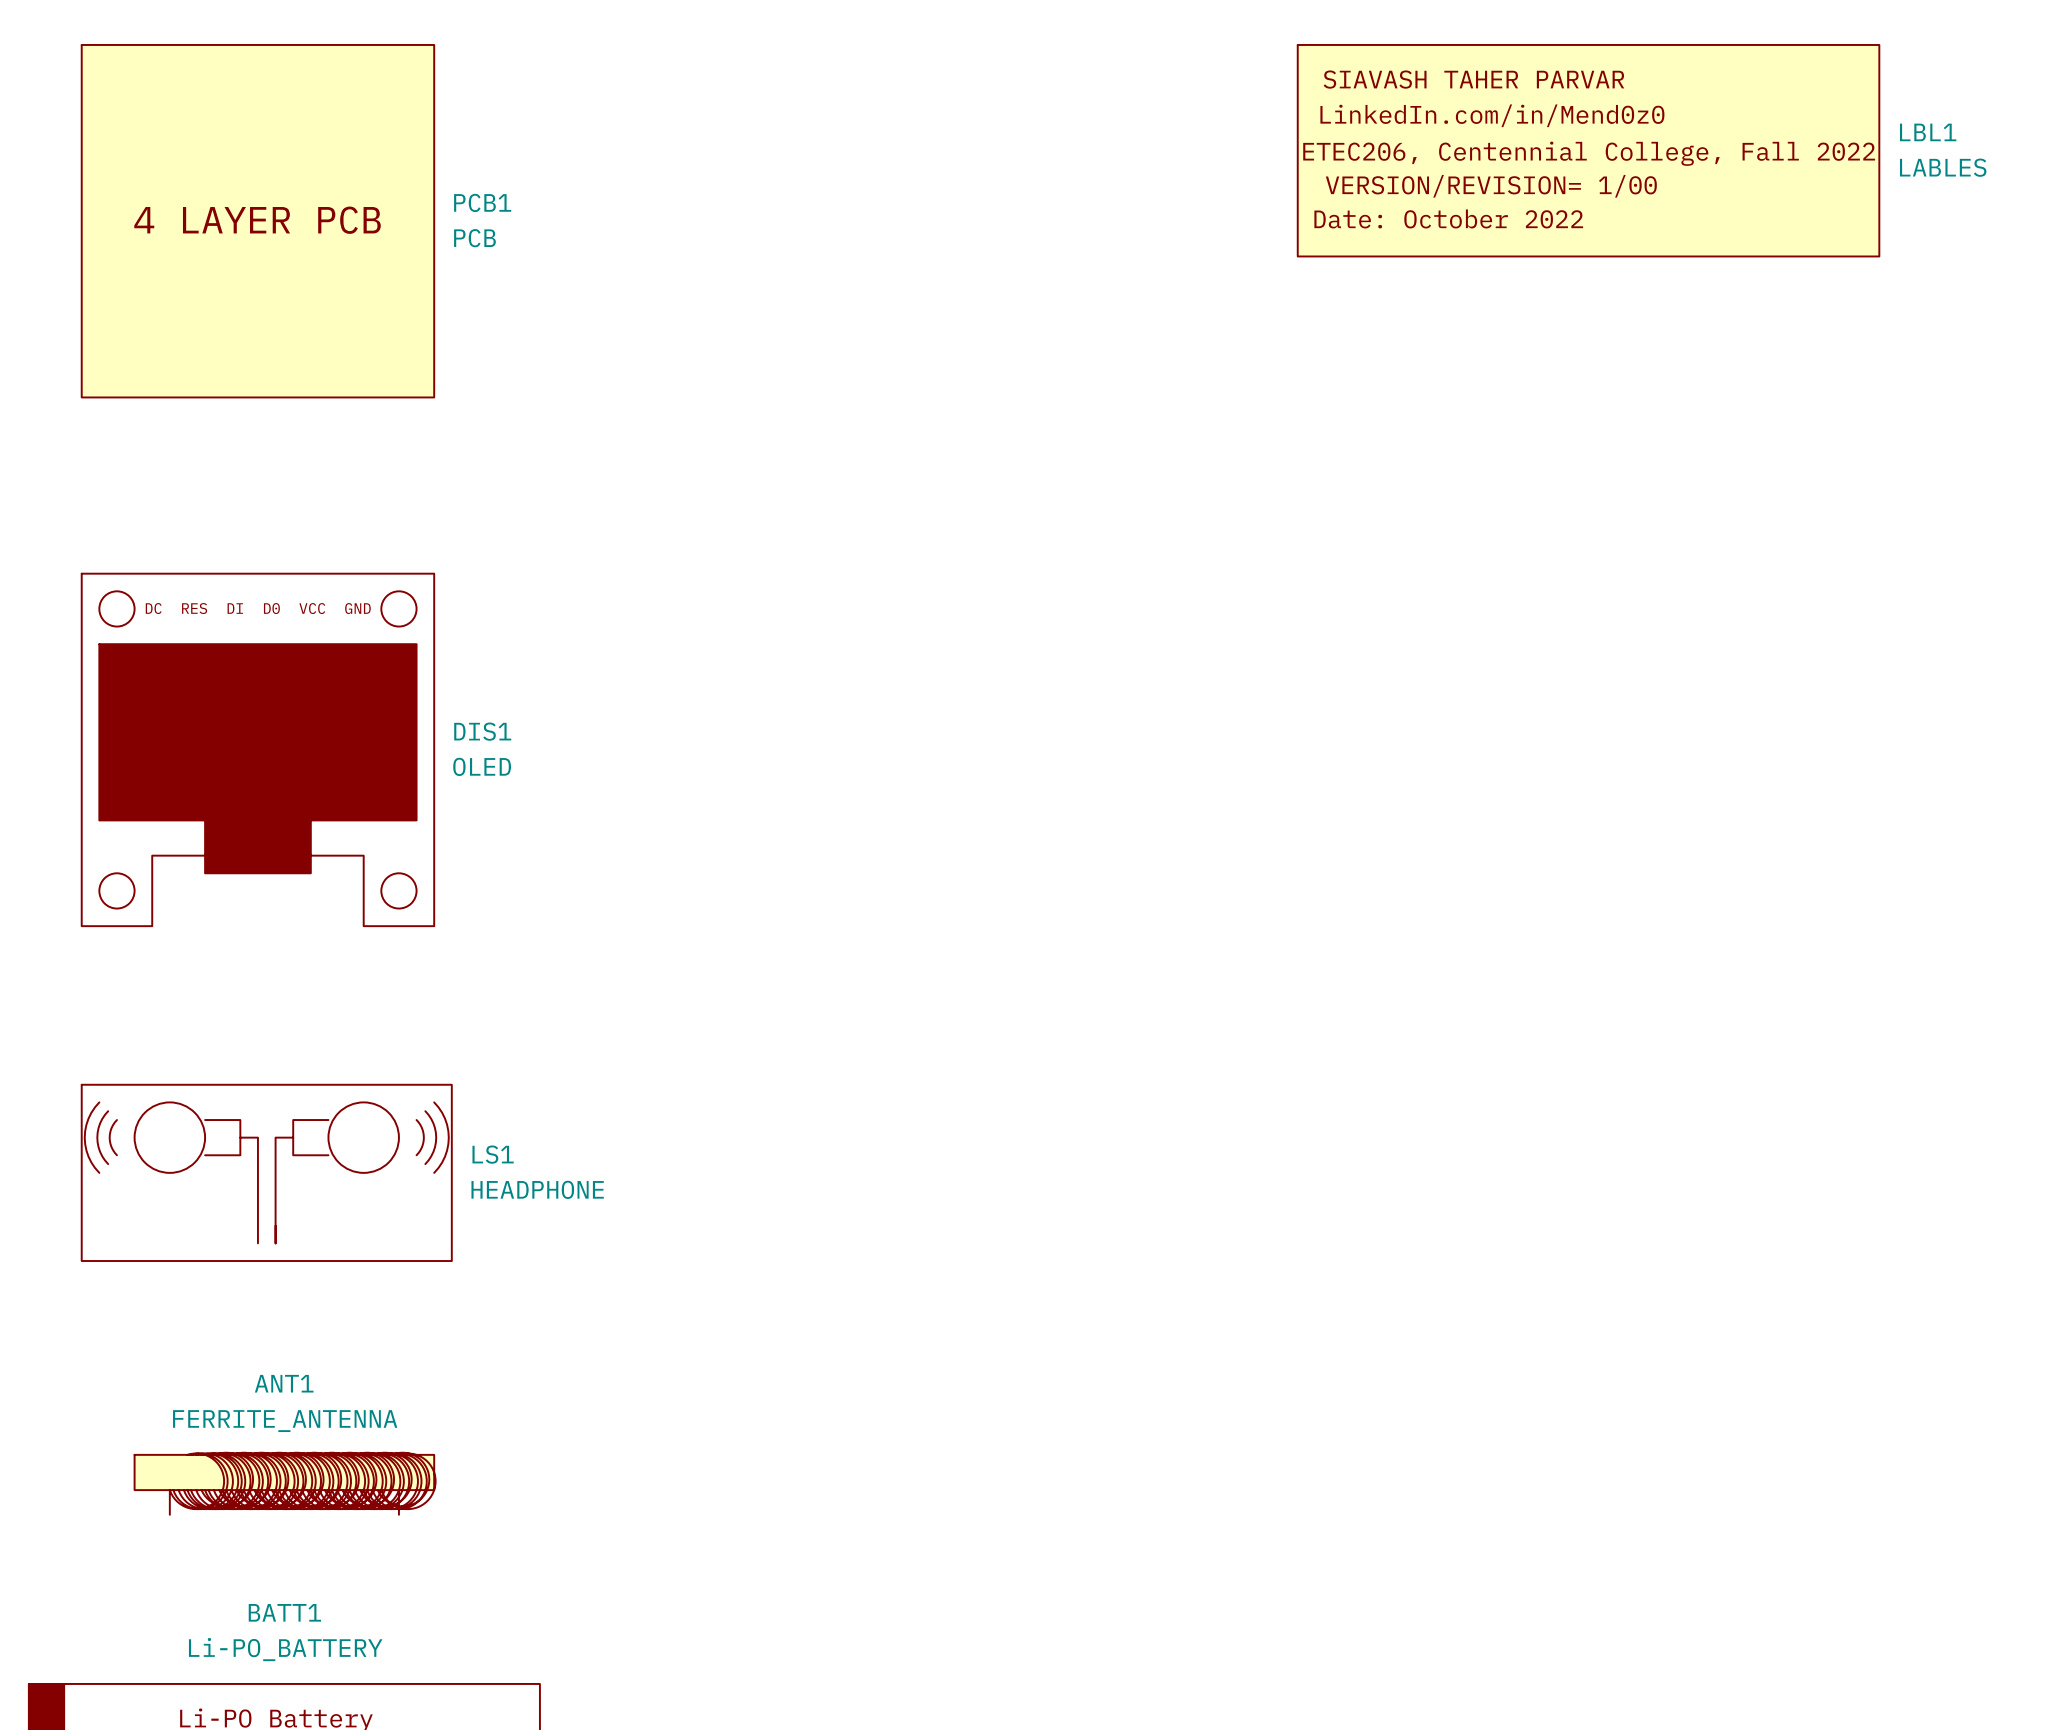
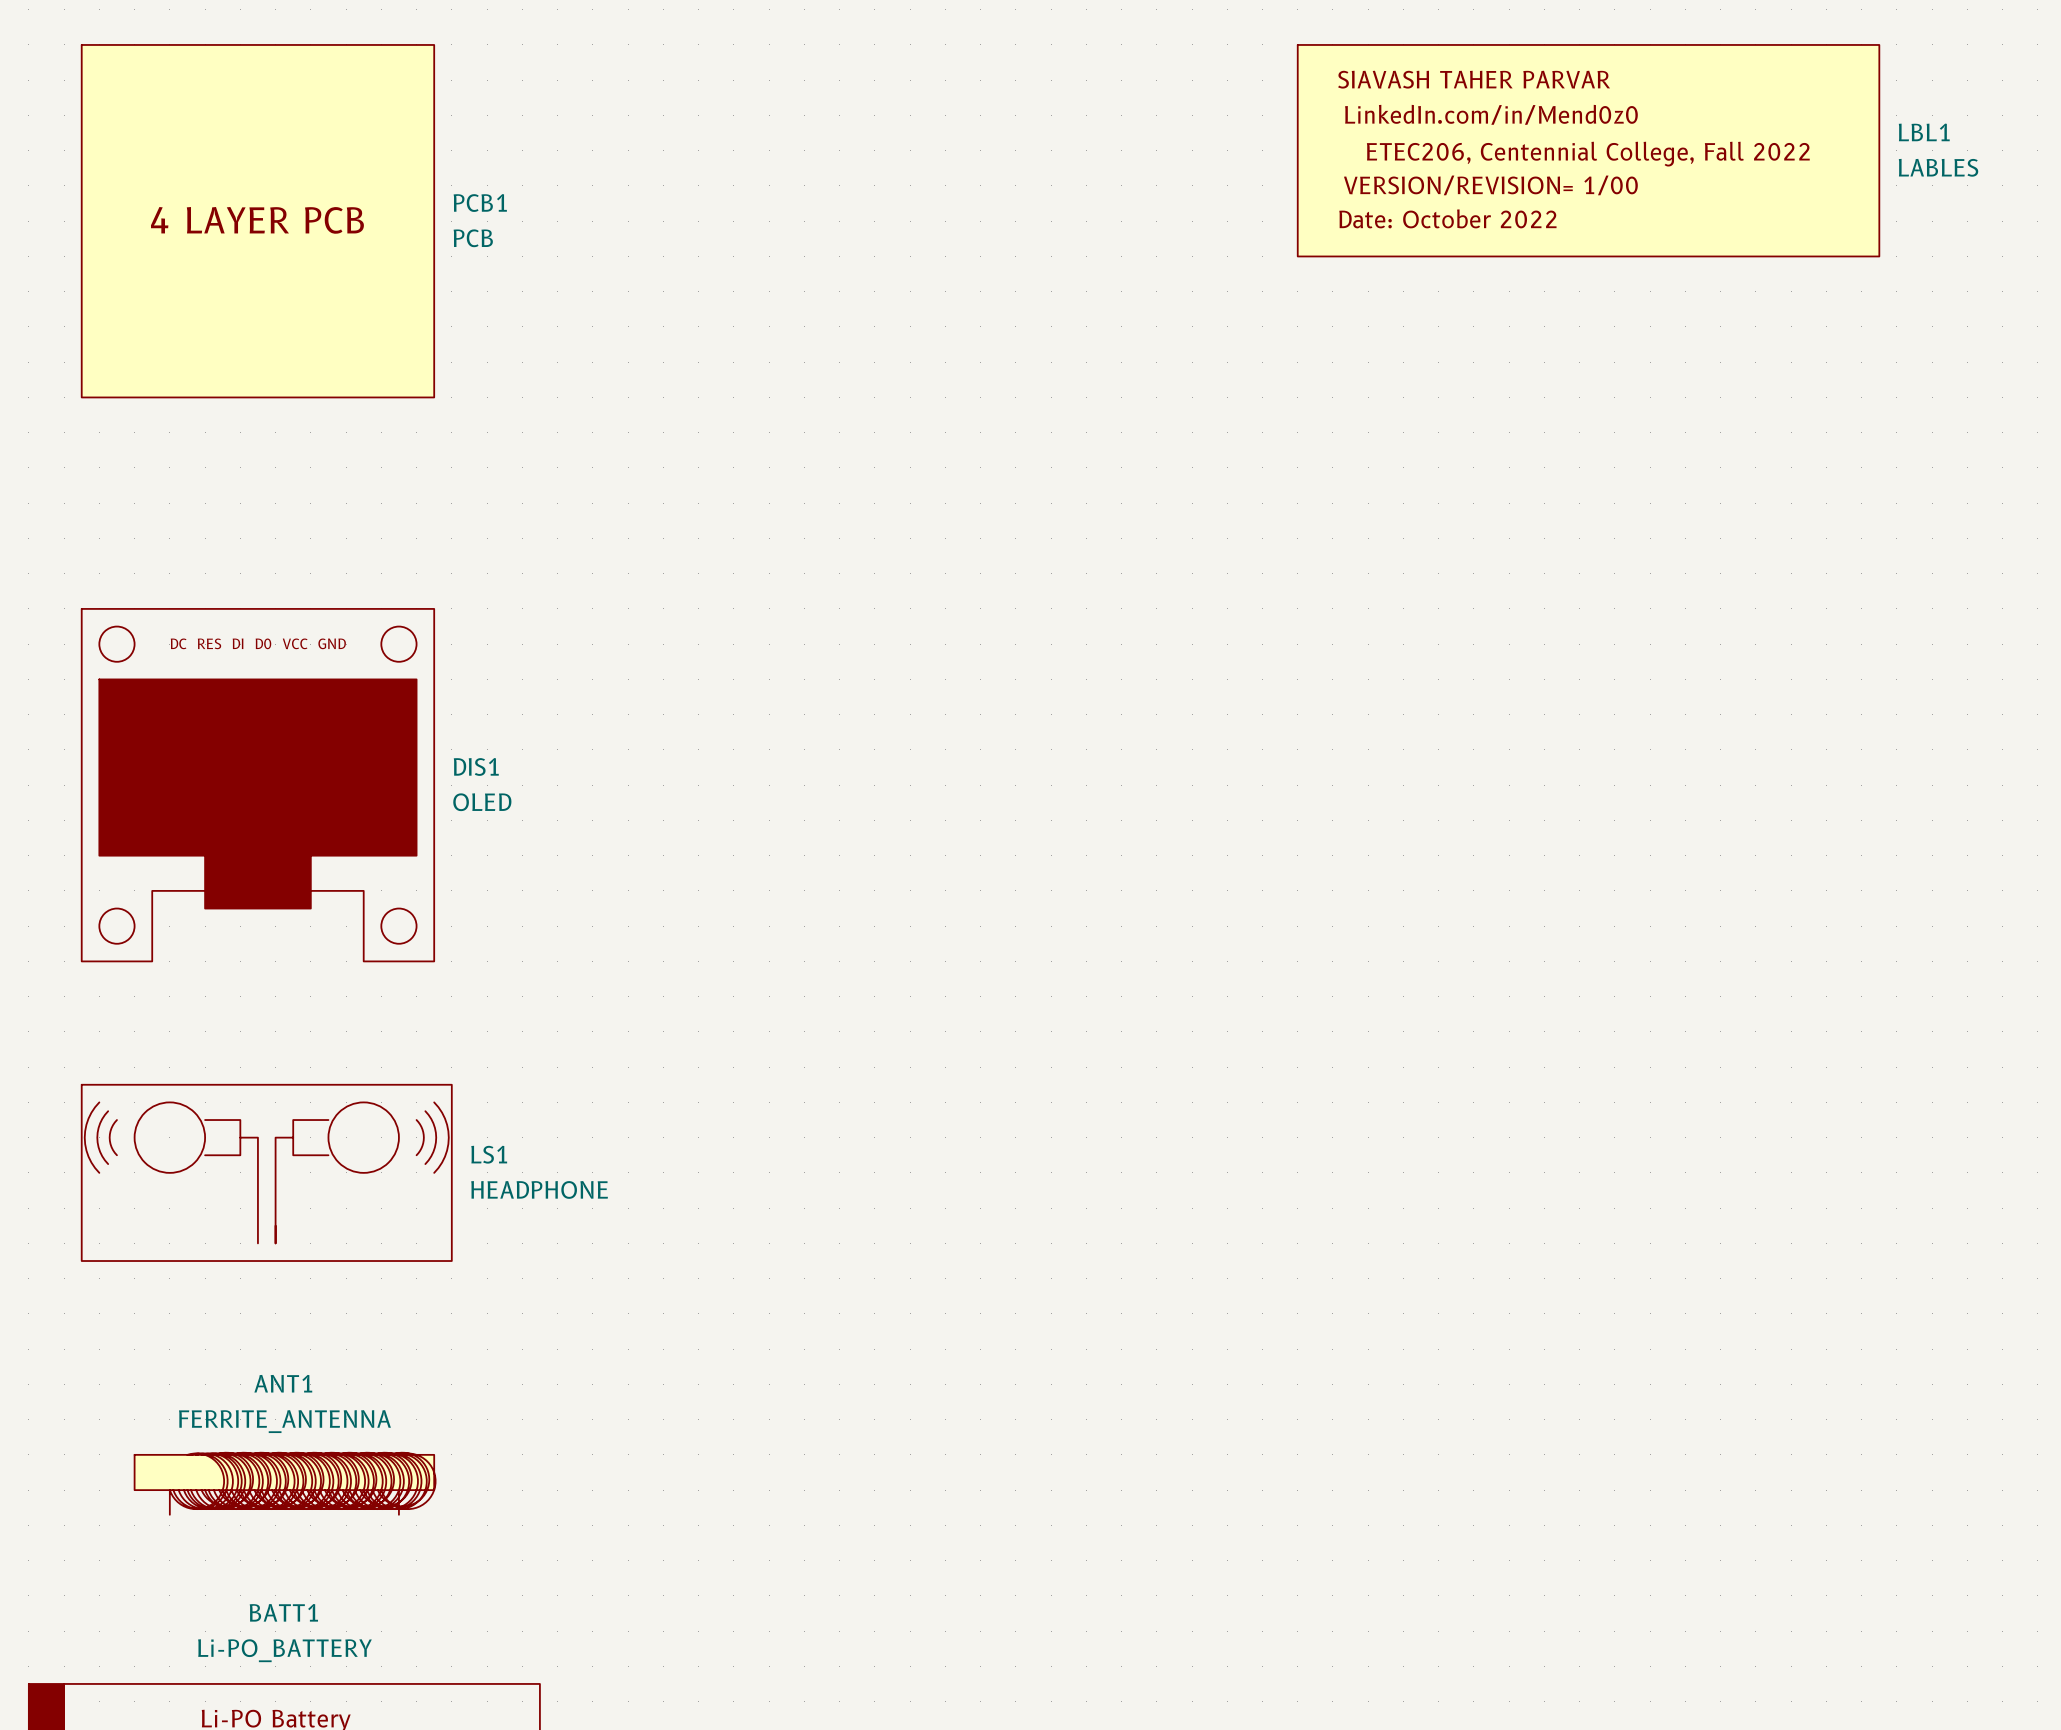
DIS1 position: (257, 749) -> (257, 785)

